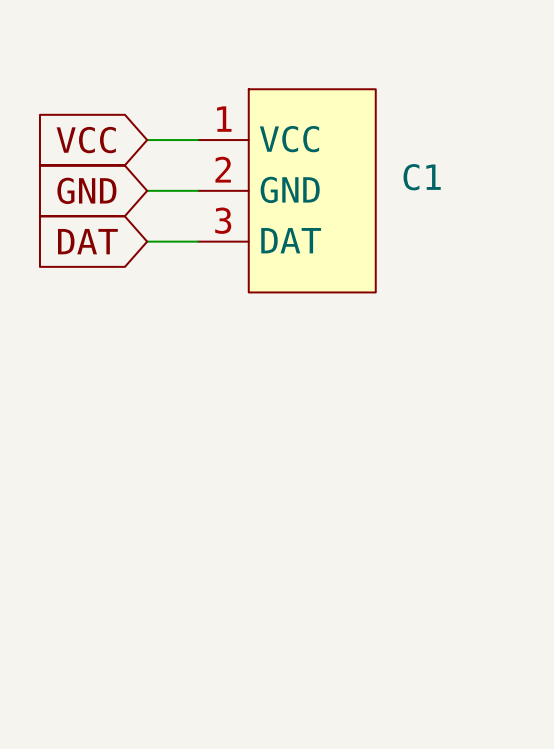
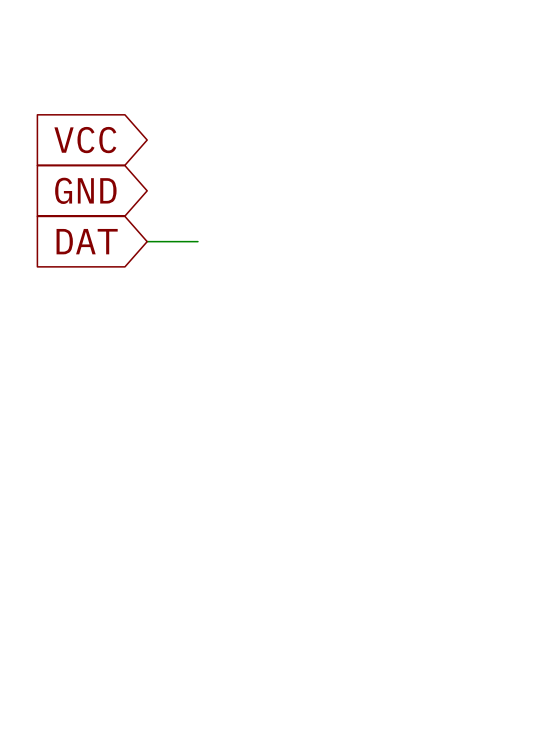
wire: (147, 140) (197, 140) -> none
wire: (147, 190) (197, 190) -> none
C1: (286, 190) -> none

